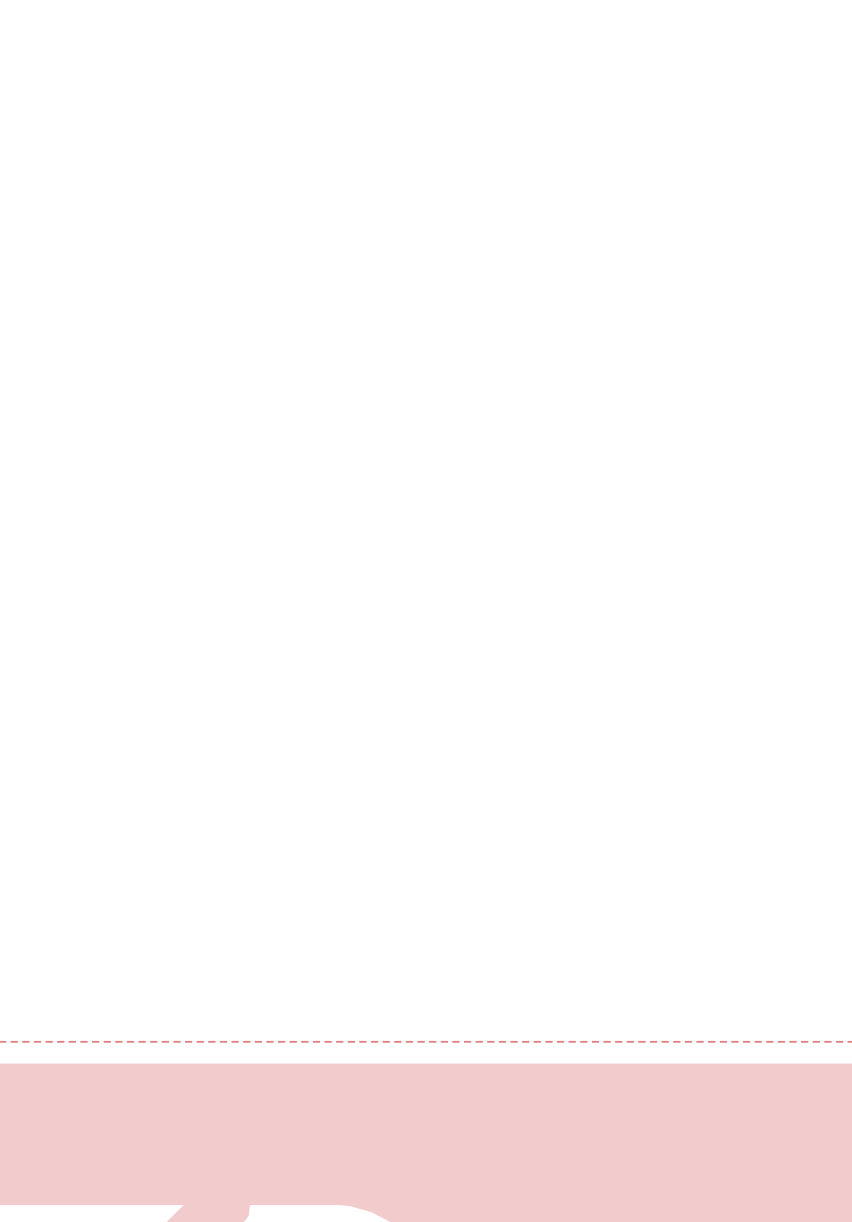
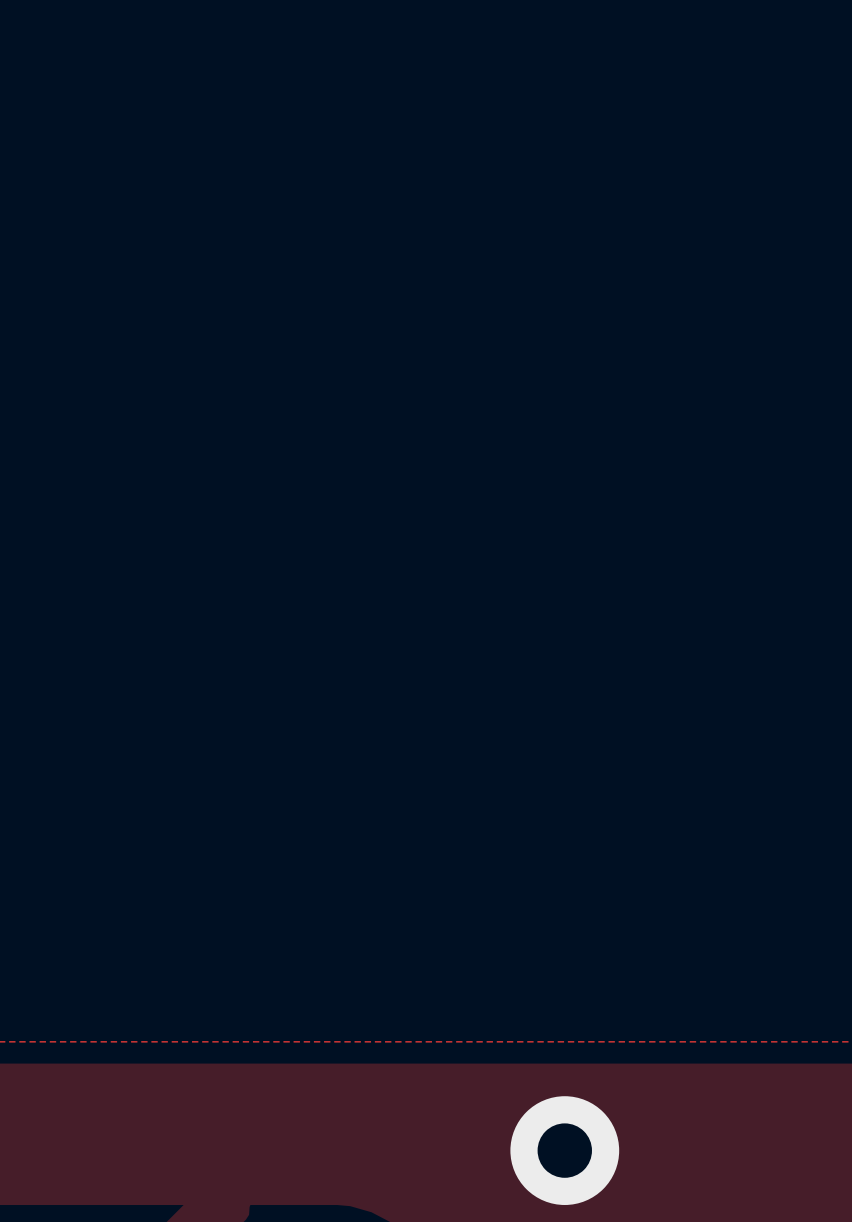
via: none -> (564, 1150)

